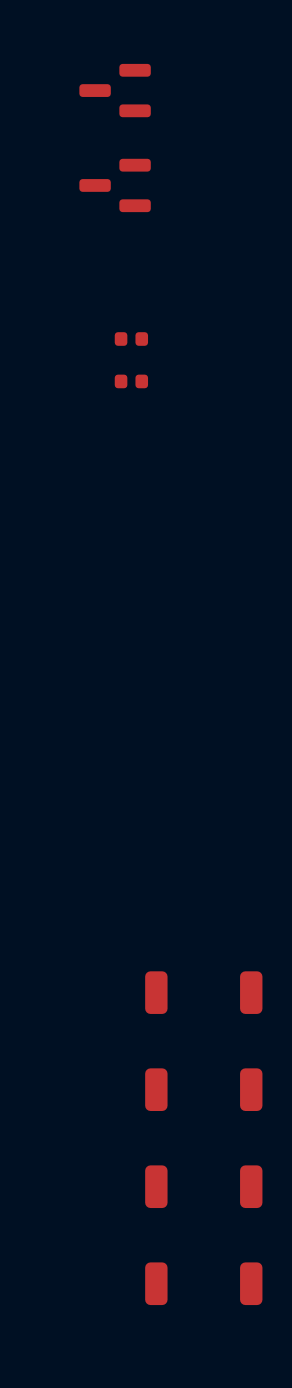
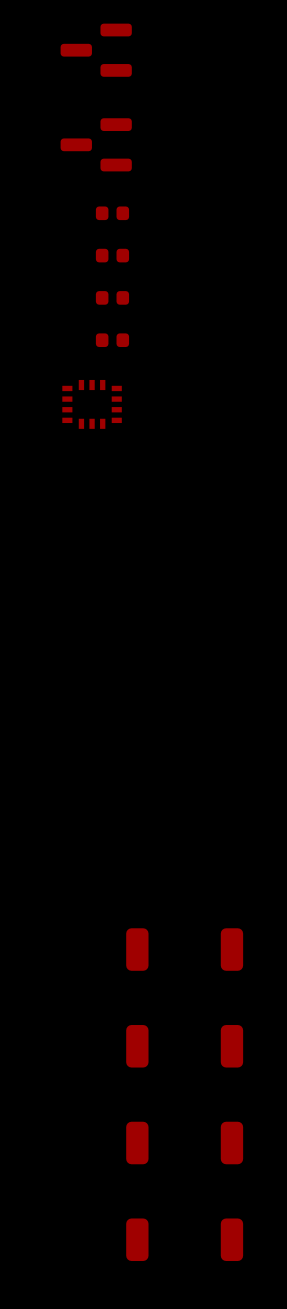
part: none -> (112, 213)
part: none -> (112, 255)
part: none -> (92, 404)

